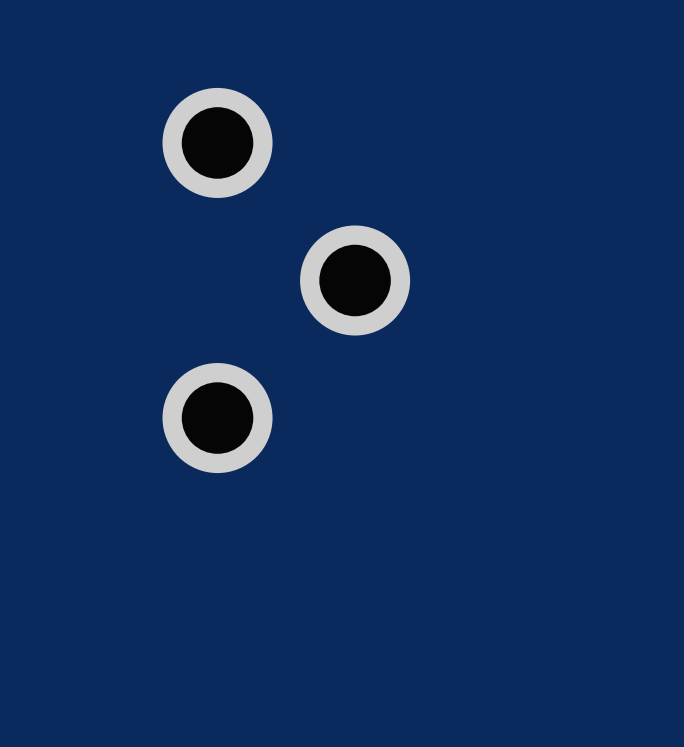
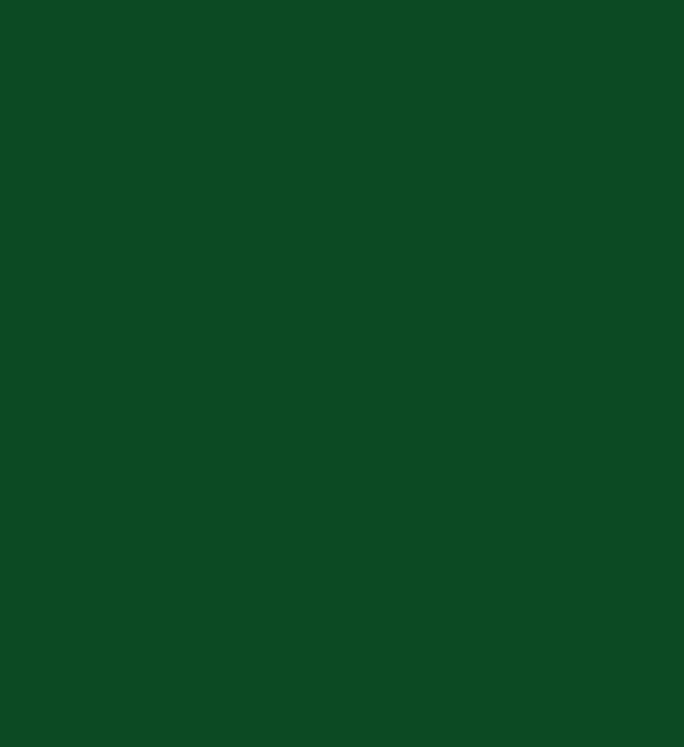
part: (286, 280) -> none

